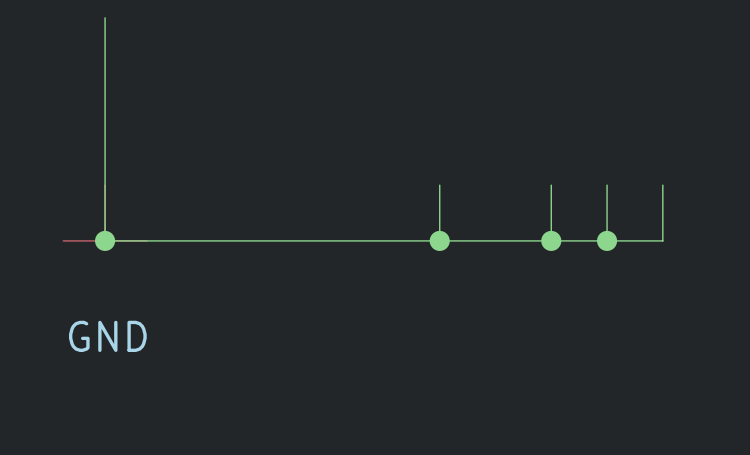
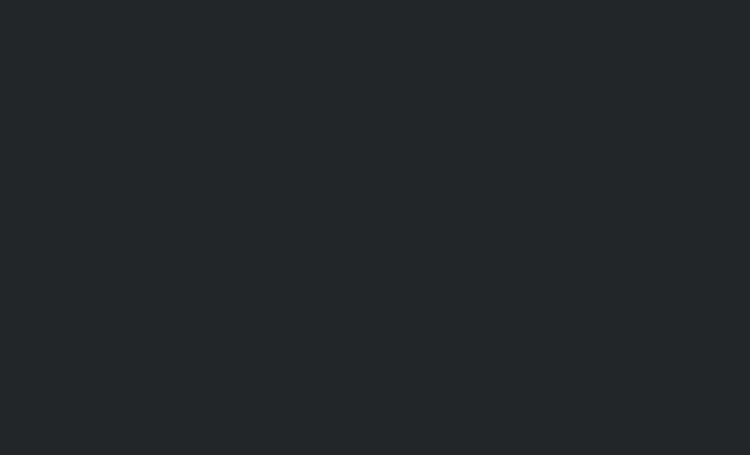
wire: (105, 17) (105, 240) (662, 240) (662, 185) -> none
wire: (439, 185) (439, 240) -> none
wire: (551, 185) (551, 240) -> none
wire: (607, 185) (607, 240) -> none
power symbol: GND (105, 213) -> none
junction: (105, 240) -> none
junction: (439, 240) -> none
junction: (551, 240) -> none
junction: (607, 240) -> none

